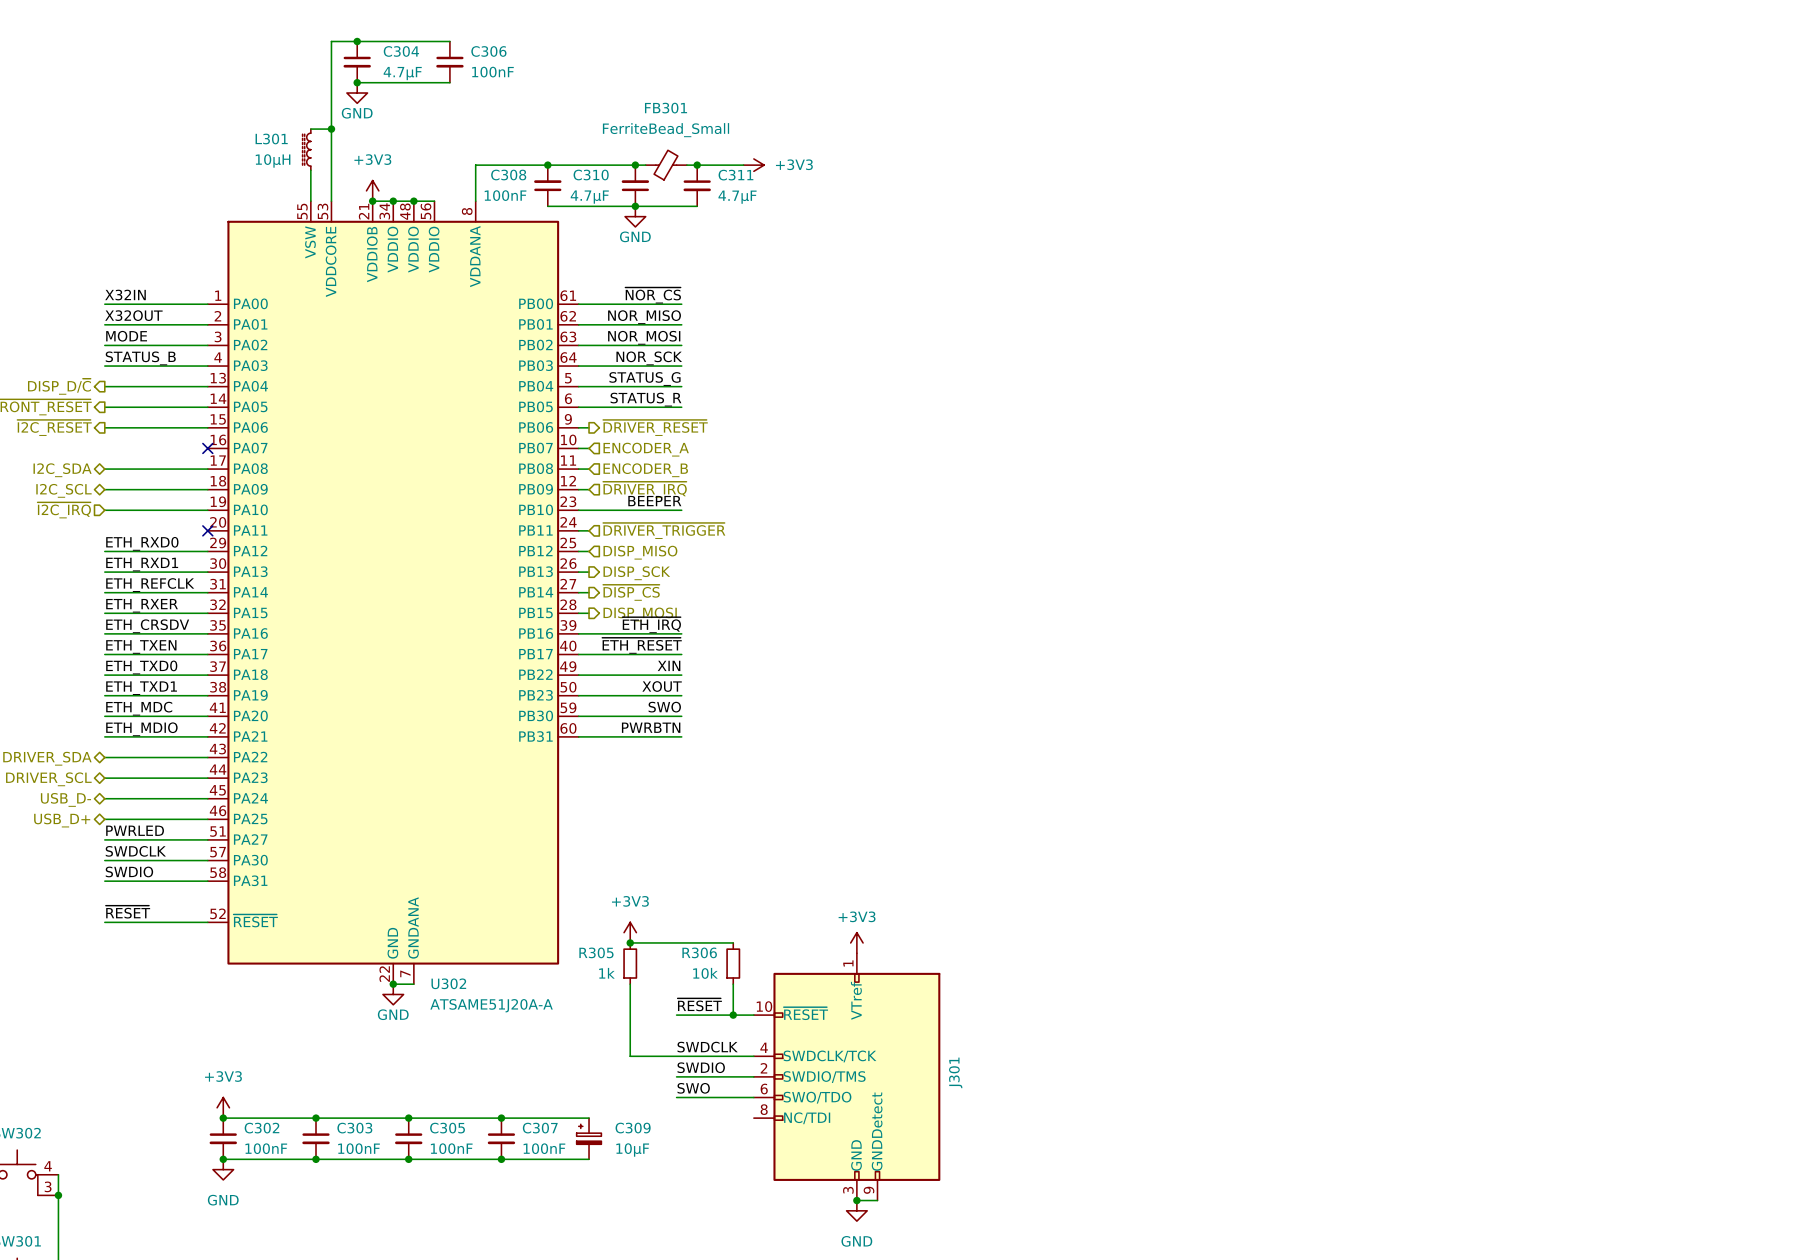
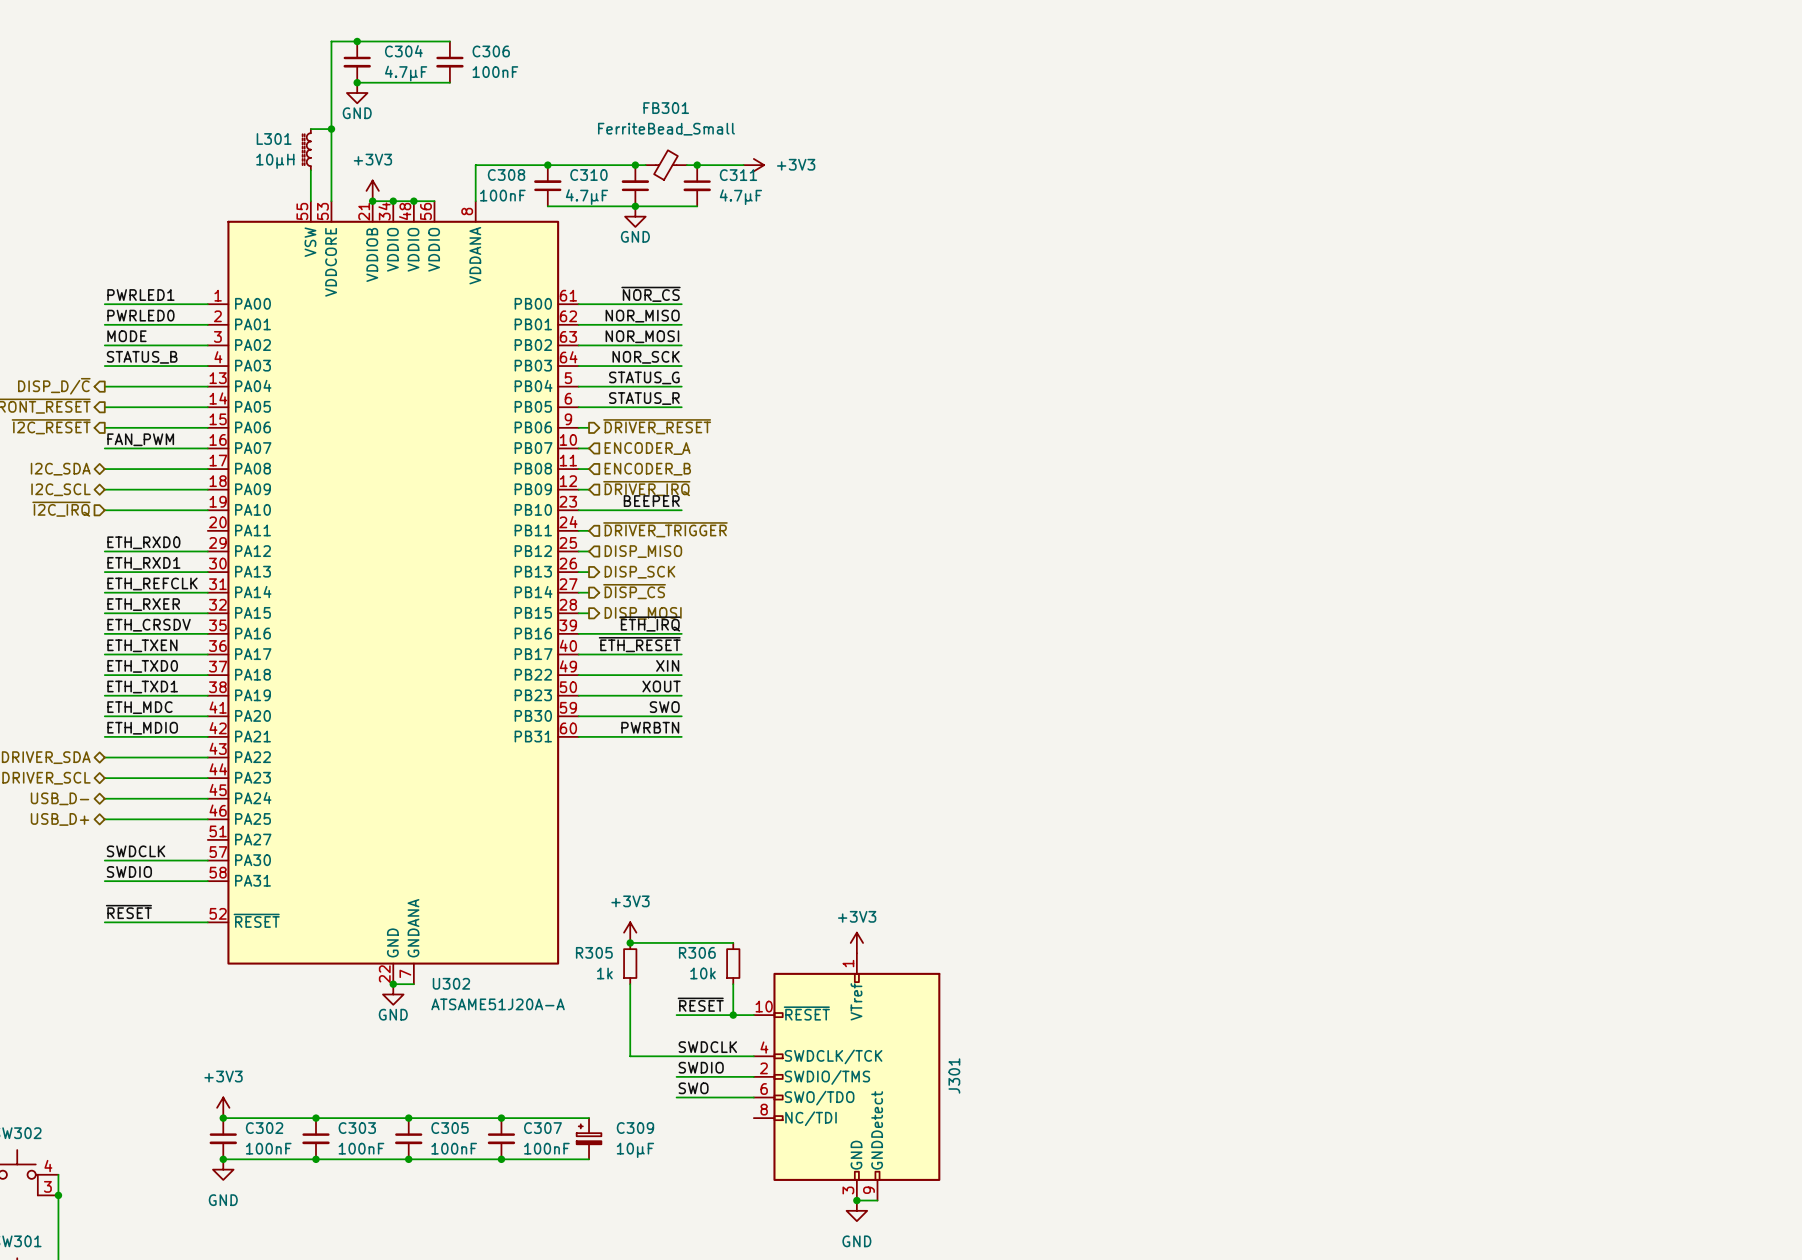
label: X32IN (125, 295) -> PWRLED1 (140, 295)
label: X32OUT (133, 315) -> PWRLED0 (140, 315)
label: none -> FAN_PWM (140, 439)
wire: none -> (104, 448) (207, 448)
no-connect mark: (207, 448) -> none
no-connect mark: (207, 530) -> none
label: PWRLED (135, 830) -> none
wire: (104, 839) (207, 839) -> none

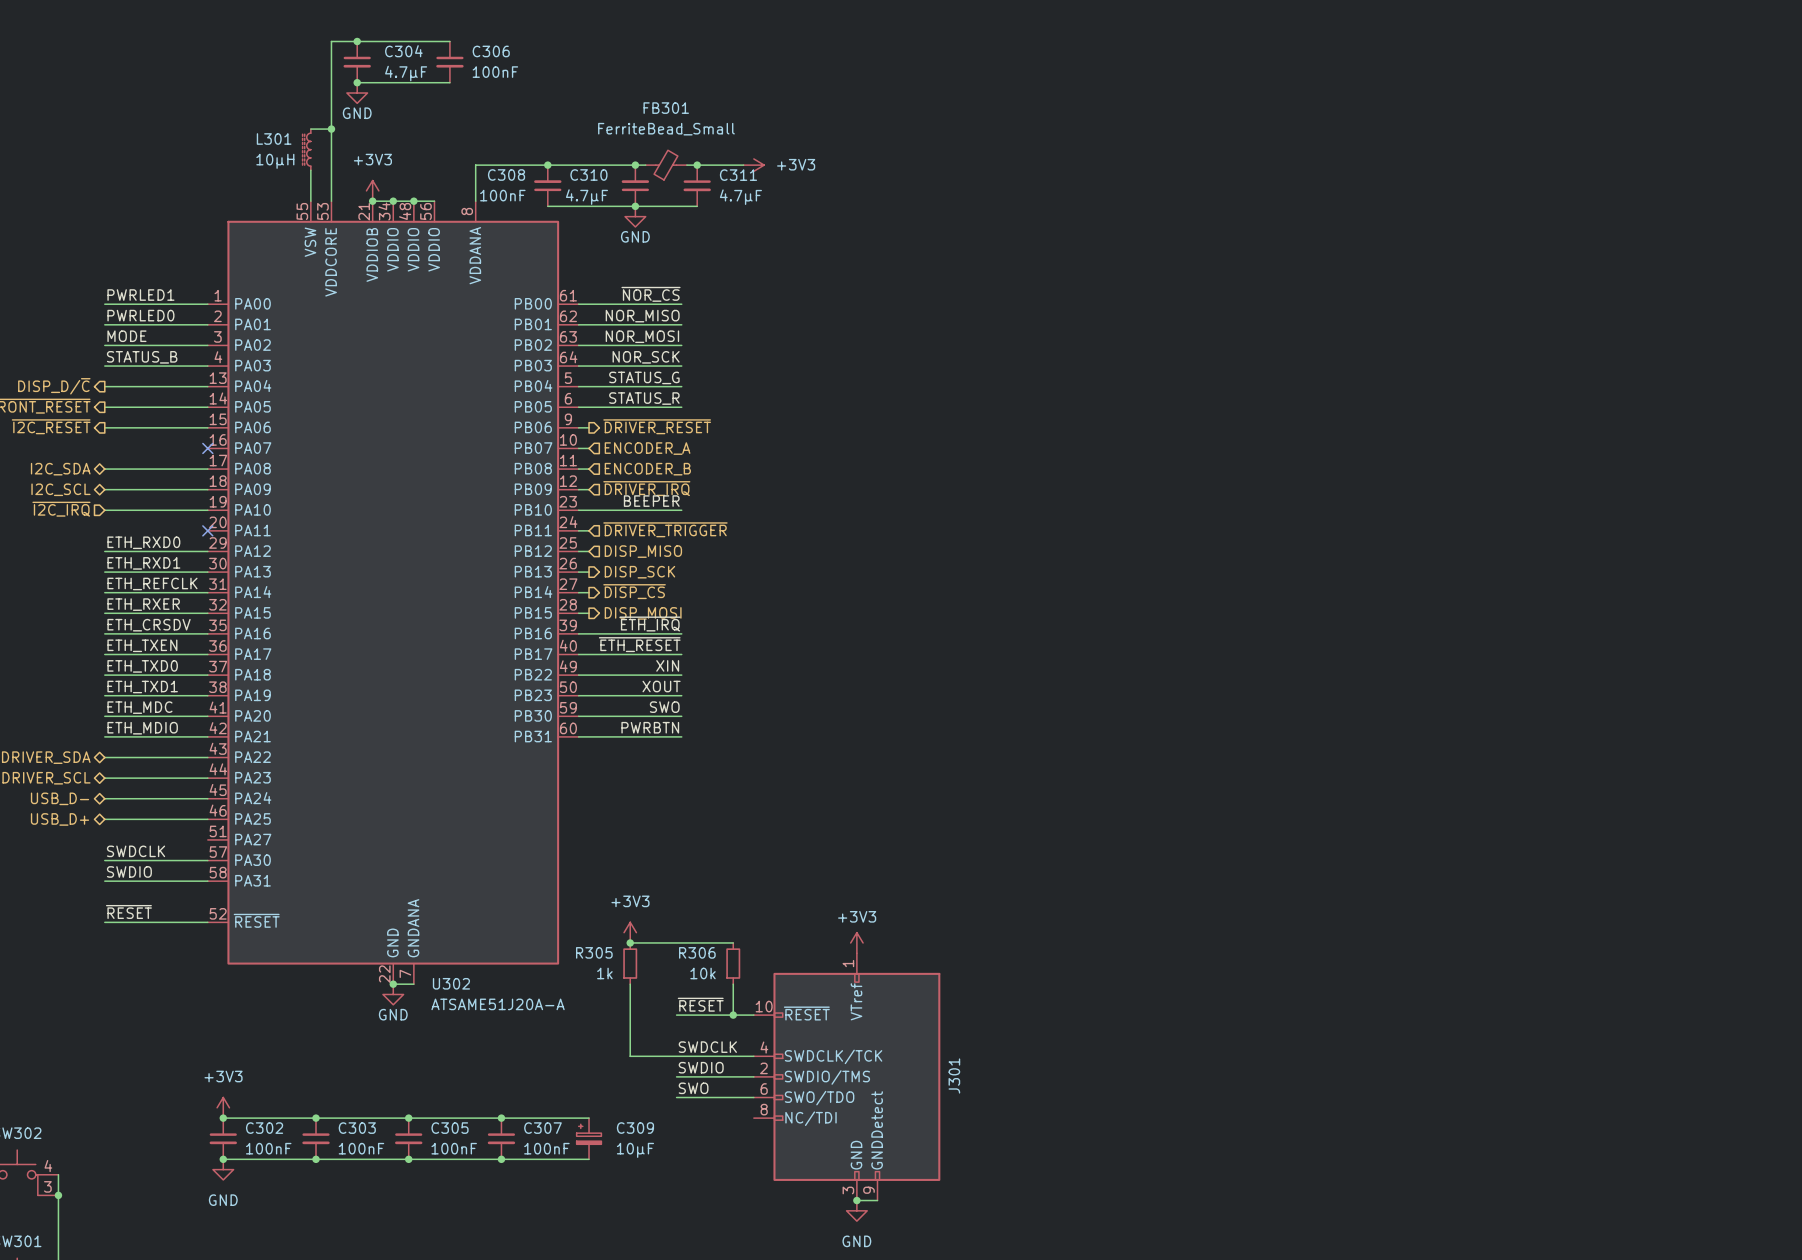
label: FAN_PWM (140, 439) -> none
wire: (104, 448) (207, 448) -> none
no-connect mark: none -> (207, 448)
no-connect mark: none -> (207, 530)

